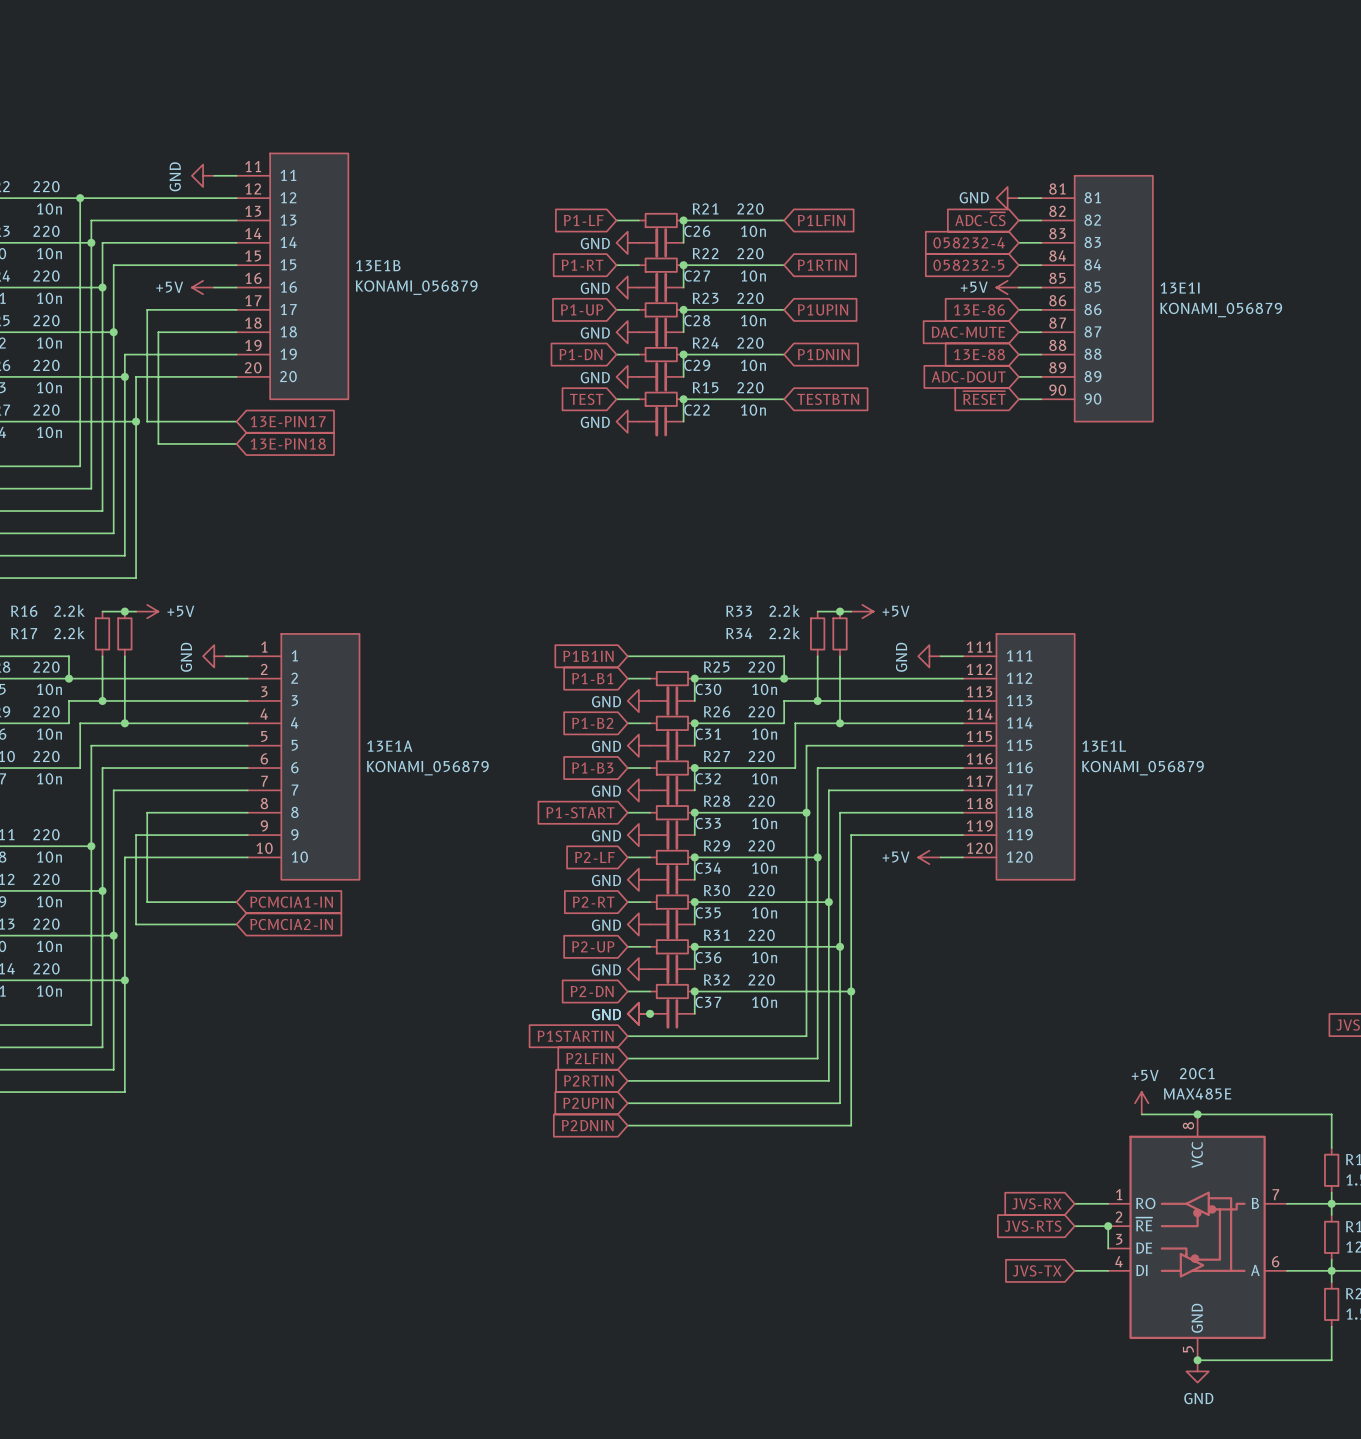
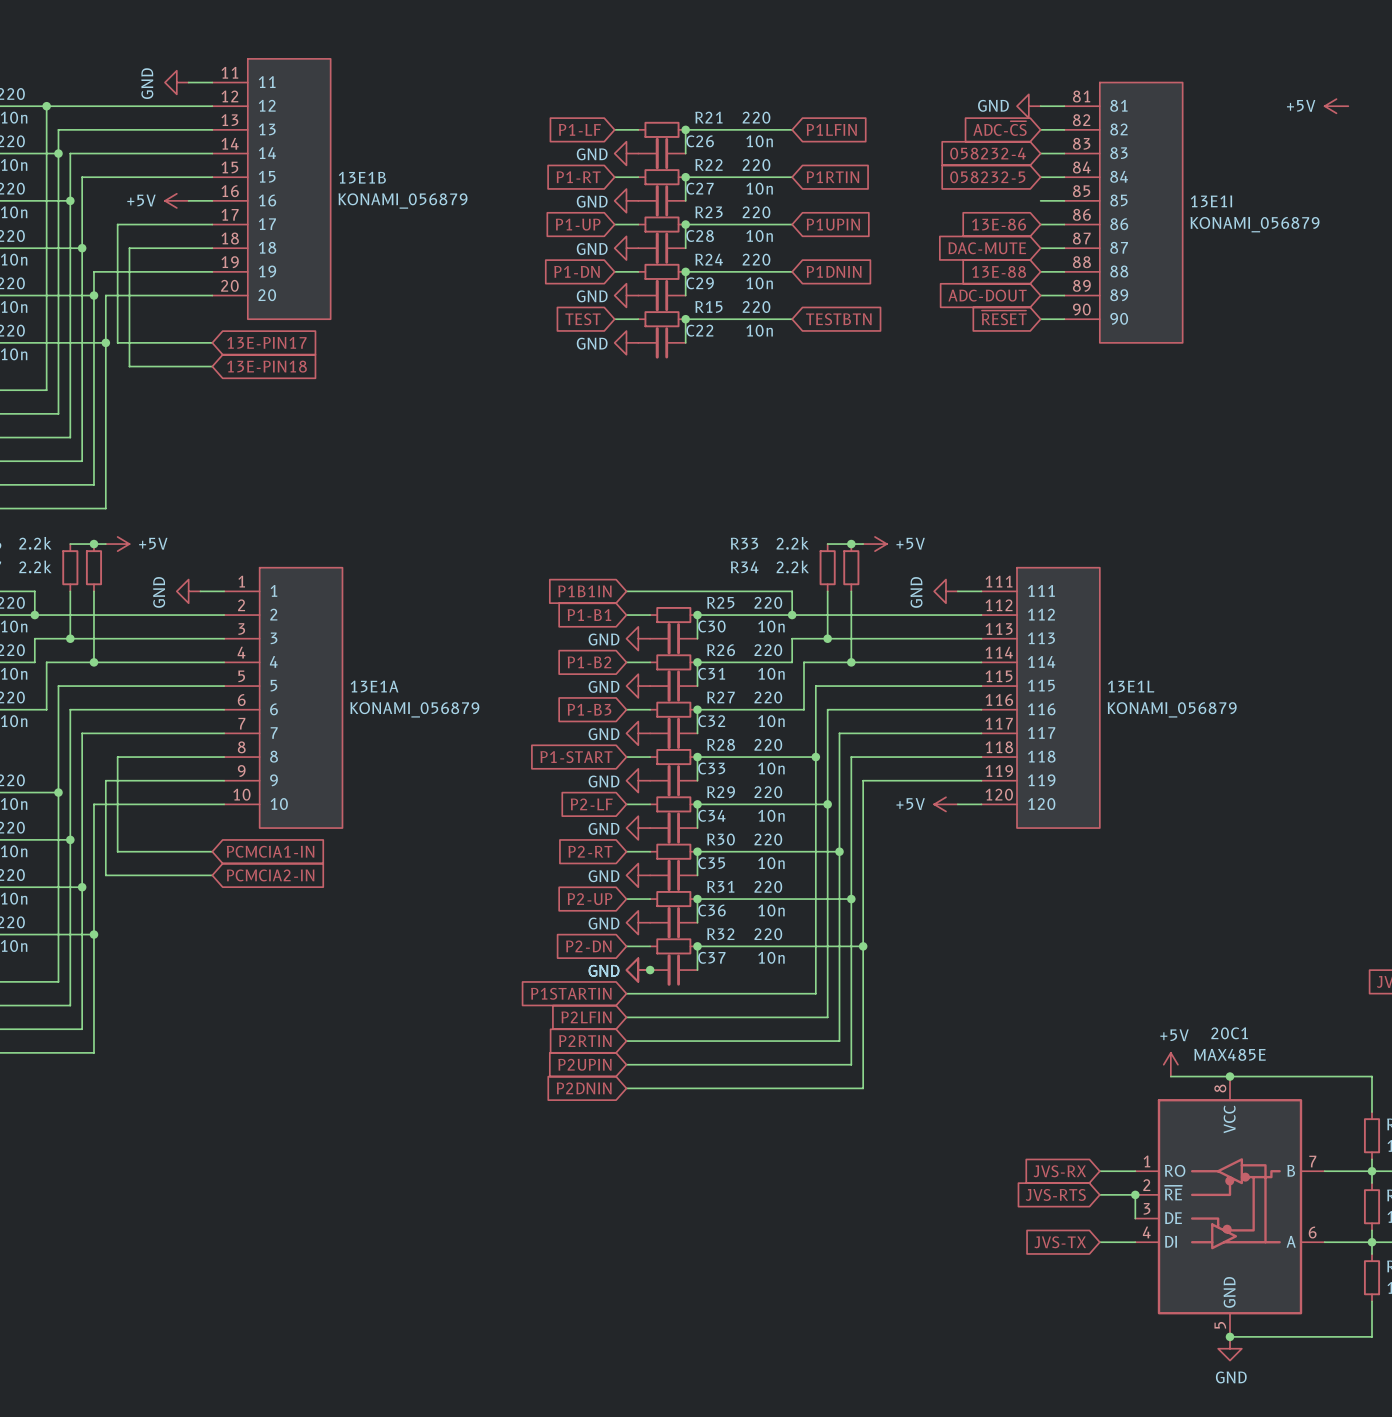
power symbol: none -> +5V (1336, 106)
power symbol: +5V (1007, 287) -> none

